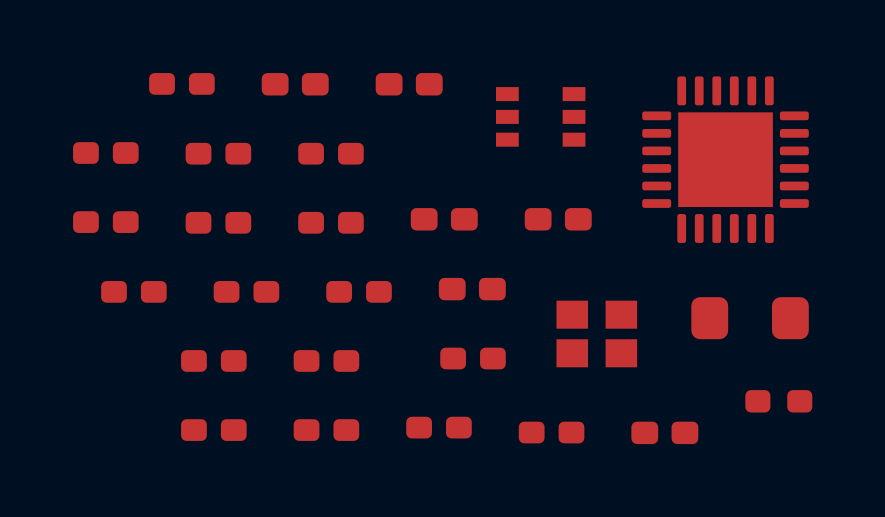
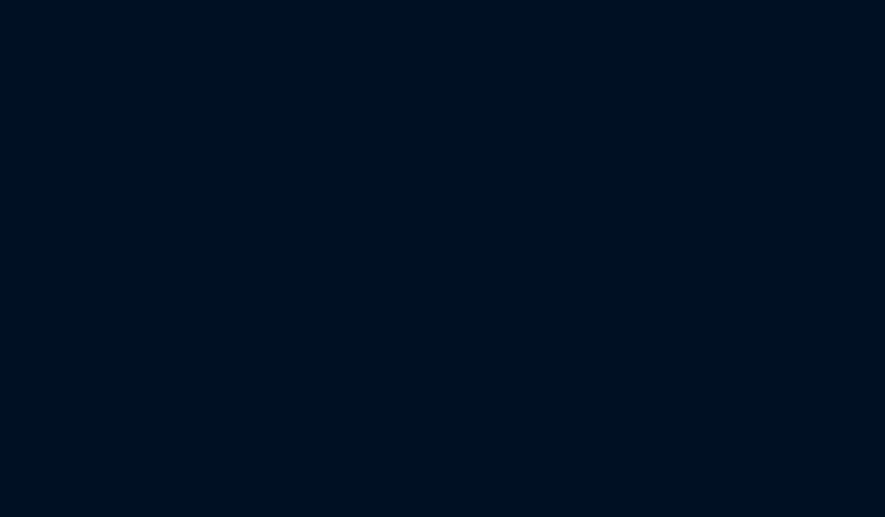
part: (181, 83) -> none
part: (295, 84) -> none
part: (409, 84) -> none
part: (540, 116) -> none
part: (105, 153) -> none
part: (218, 153) -> none
part: (330, 153) -> none
part: (725, 159) -> none
part: (444, 219) -> none
part: (558, 219) -> none
part: (105, 222) -> none
part: (218, 222) -> none
part: (330, 222) -> none
part: (472, 289) -> none
part: (133, 291) -> none
part: (246, 291) -> none
part: (359, 291) -> none
part: (750, 318) -> none
part: (596, 333) -> none
part: (473, 358) -> none
part: (213, 360) -> none
part: (326, 360) -> none
part: (778, 401) -> none
part: (439, 427) -> none
part: (213, 430) -> none
part: (326, 430) -> none
part: (551, 432) -> none
part: (664, 432) -> none

